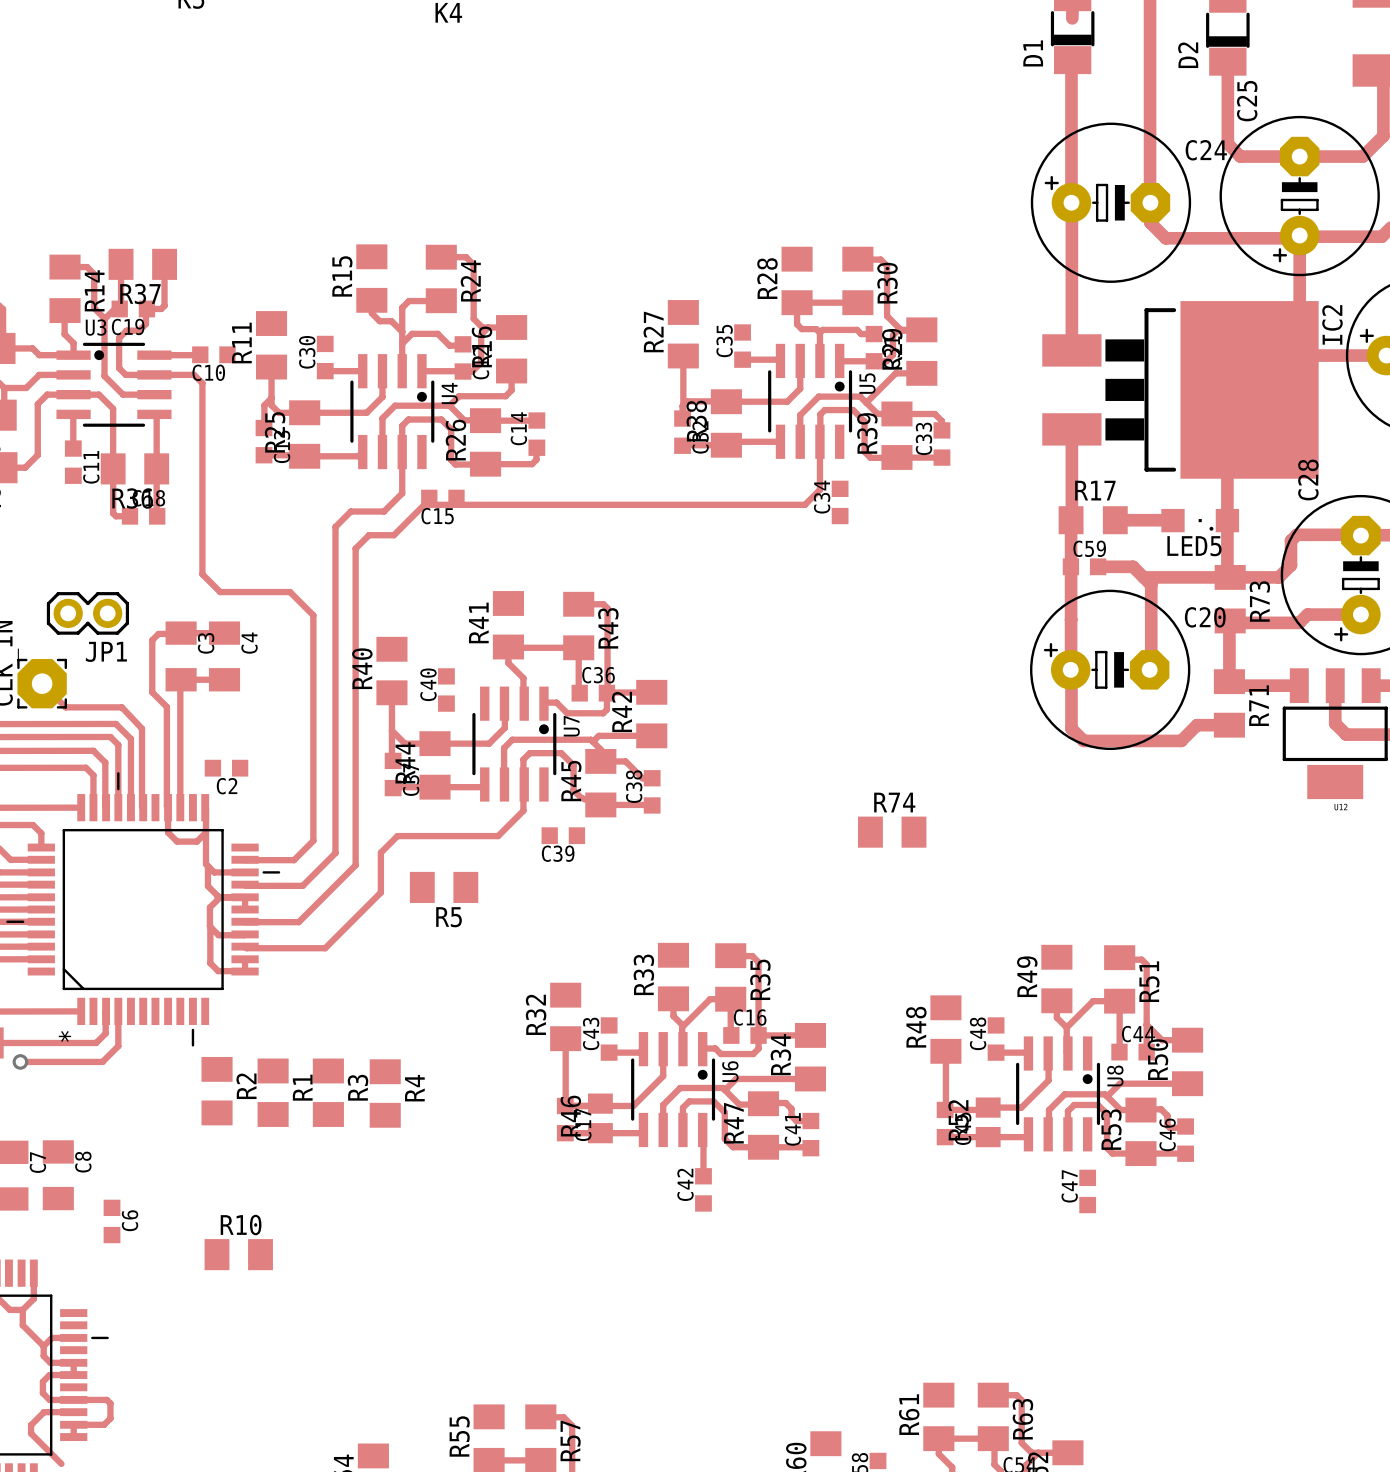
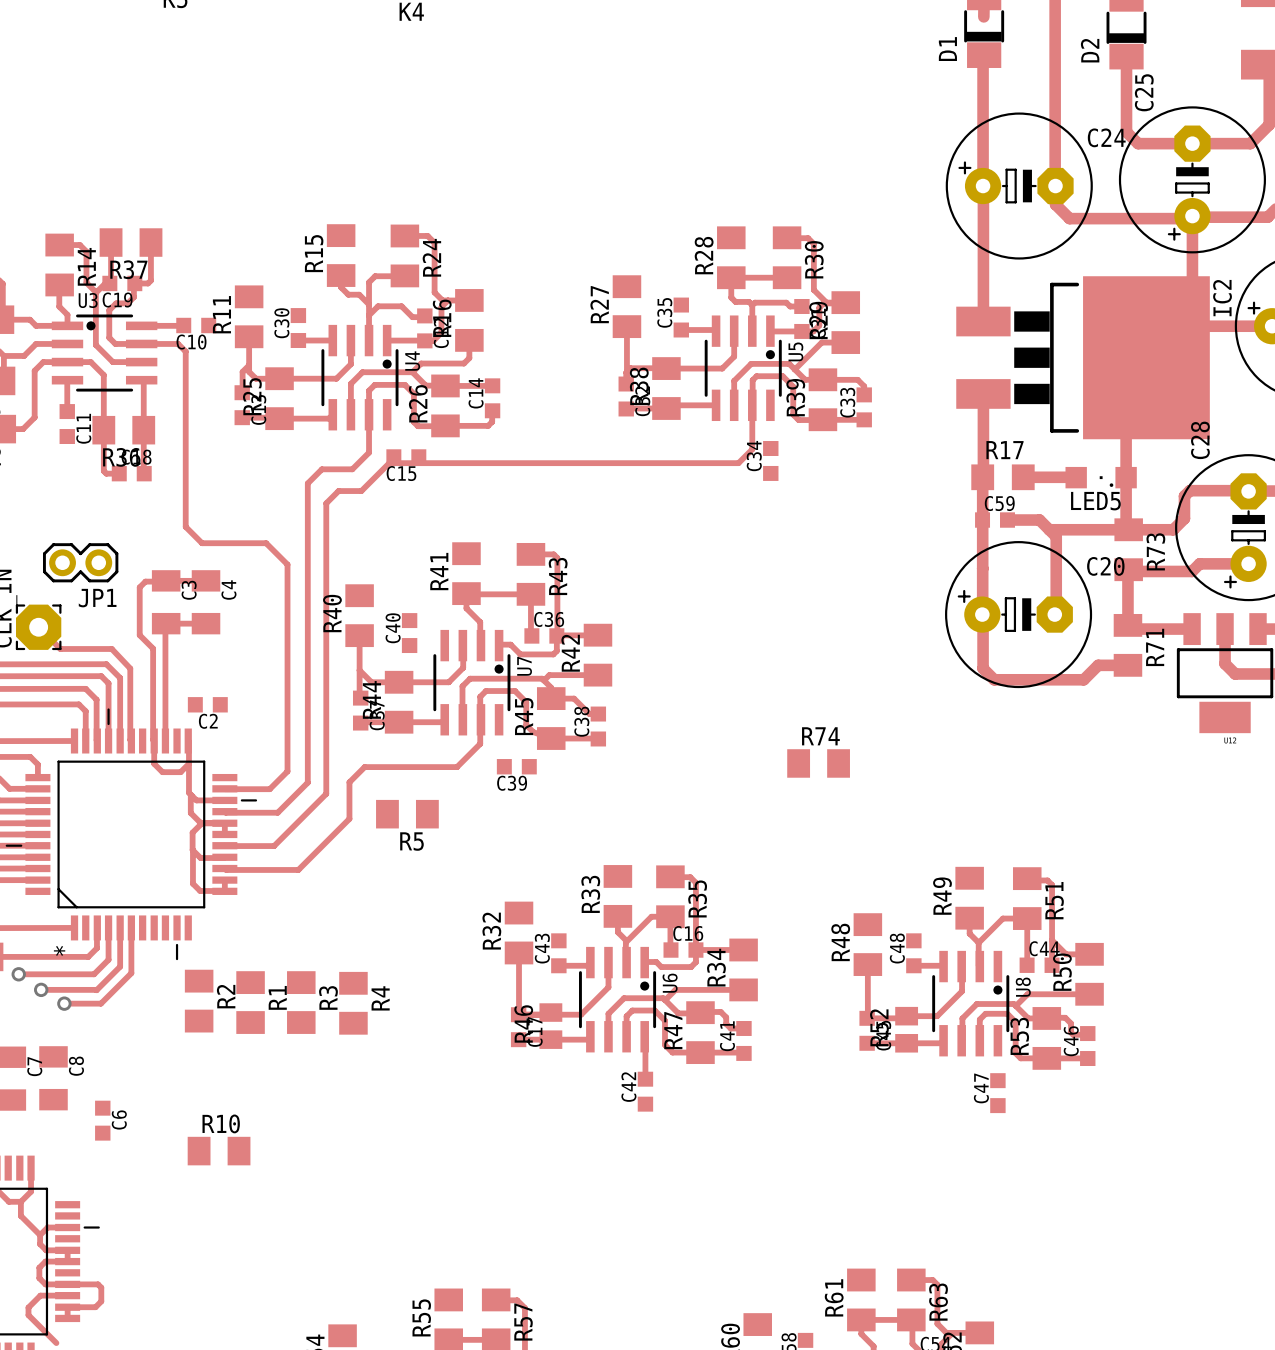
track: none -> (120, 927) (120, 966) (96, 990) (41, 989)
track: none -> (131, 927) (131, 973) (100, 1003) (64, 1003)
via: none -> (41, 989)
via: none -> (64, 1003)

